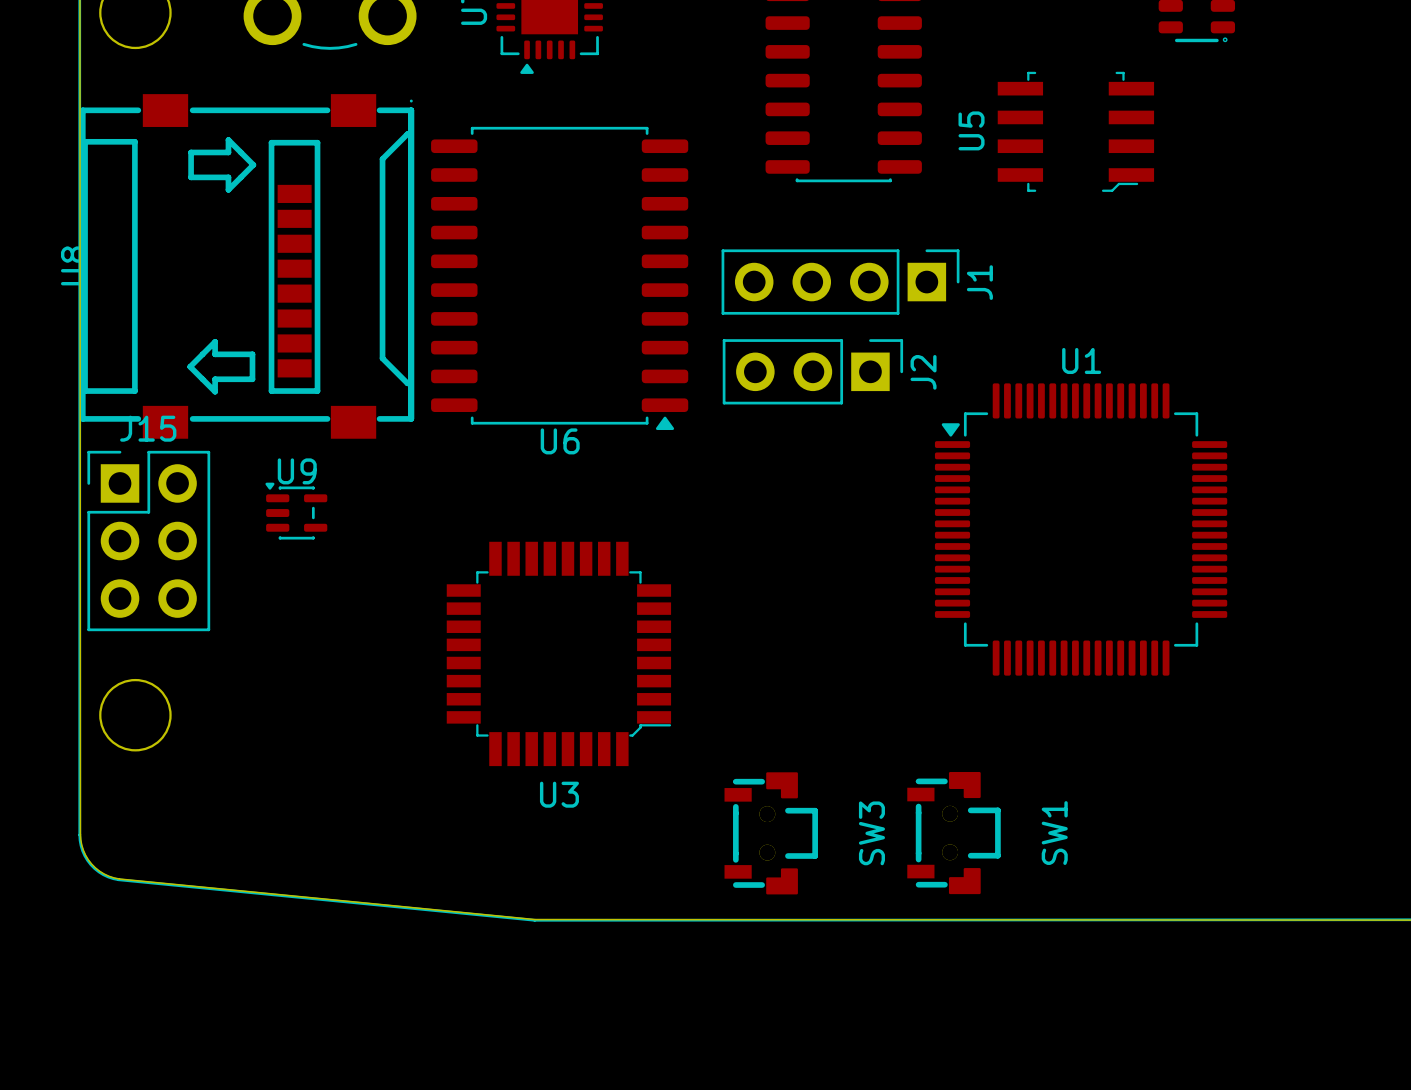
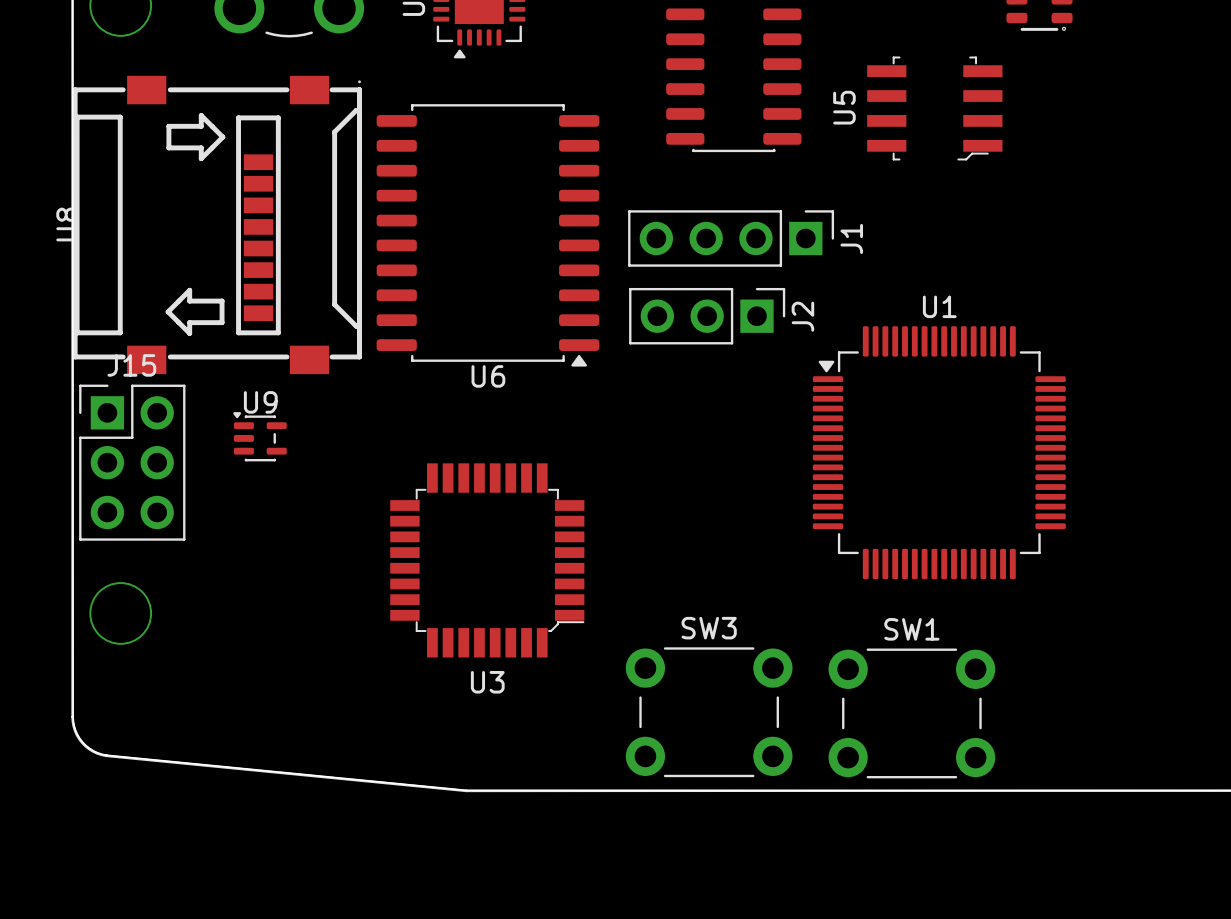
SW1 footprint: [907, 771, 1001, 895] -> [828, 648, 996, 779]
SW3 footprint: [724, 772, 818, 895] -> [625, 647, 793, 778]
SW3 name position: SW3 (871, 833) -> SW3 (709, 628)
SW1 name position: SW1 (1054, 833) -> SW1 (911, 629)

